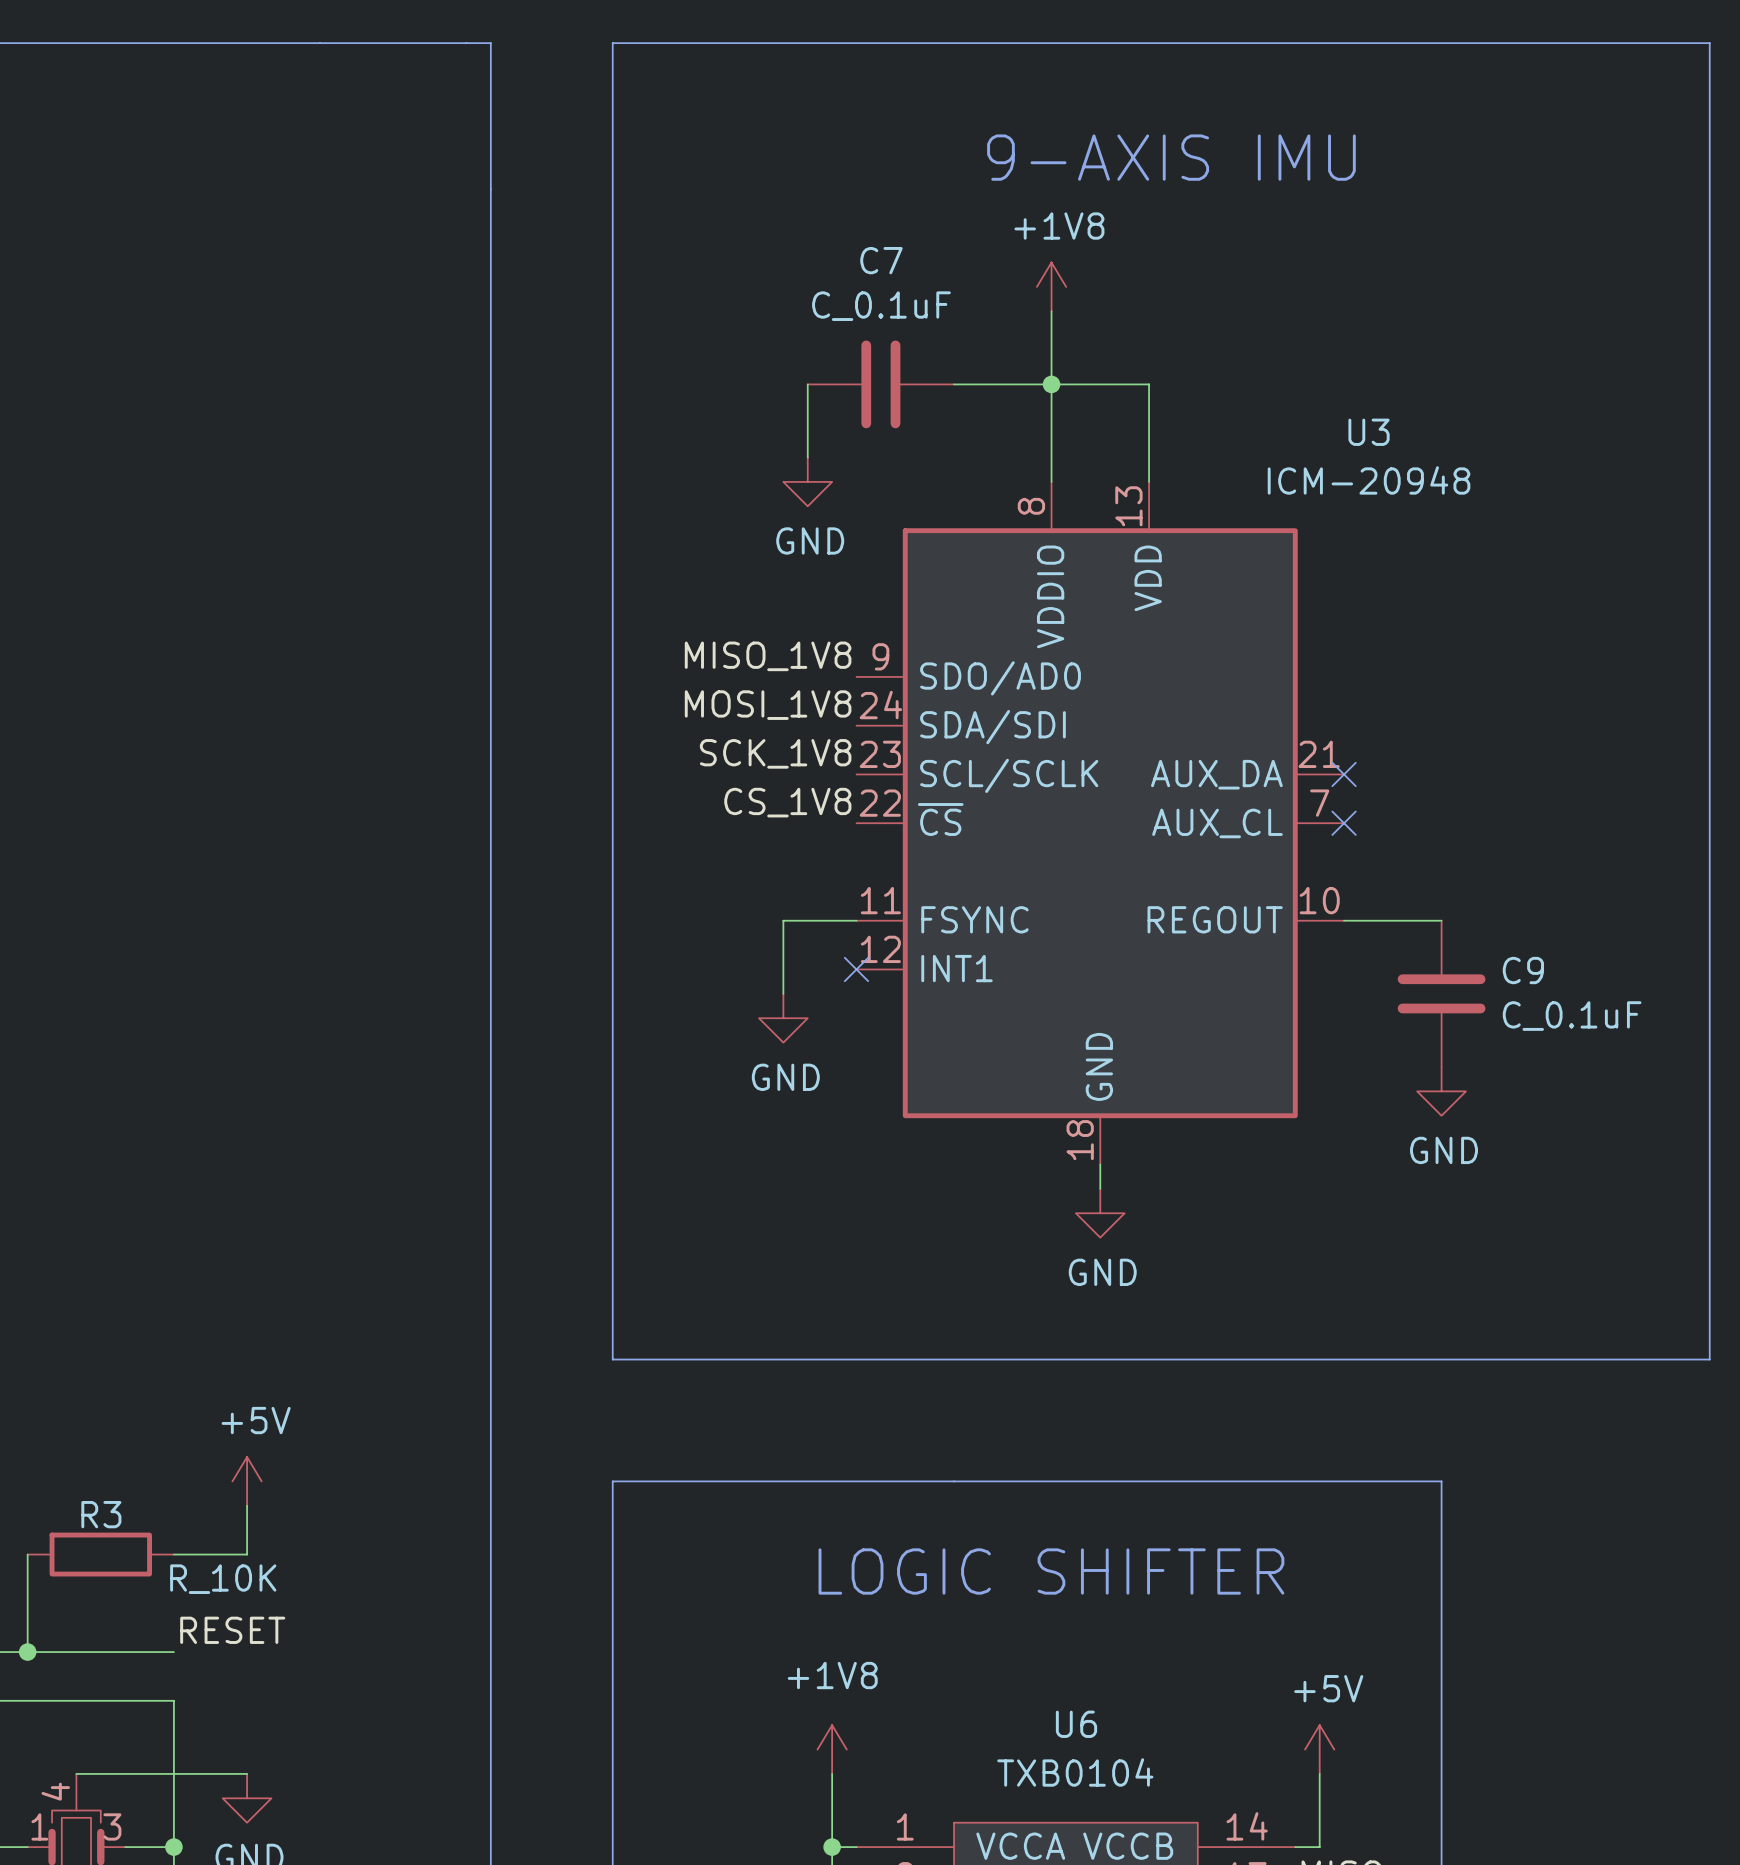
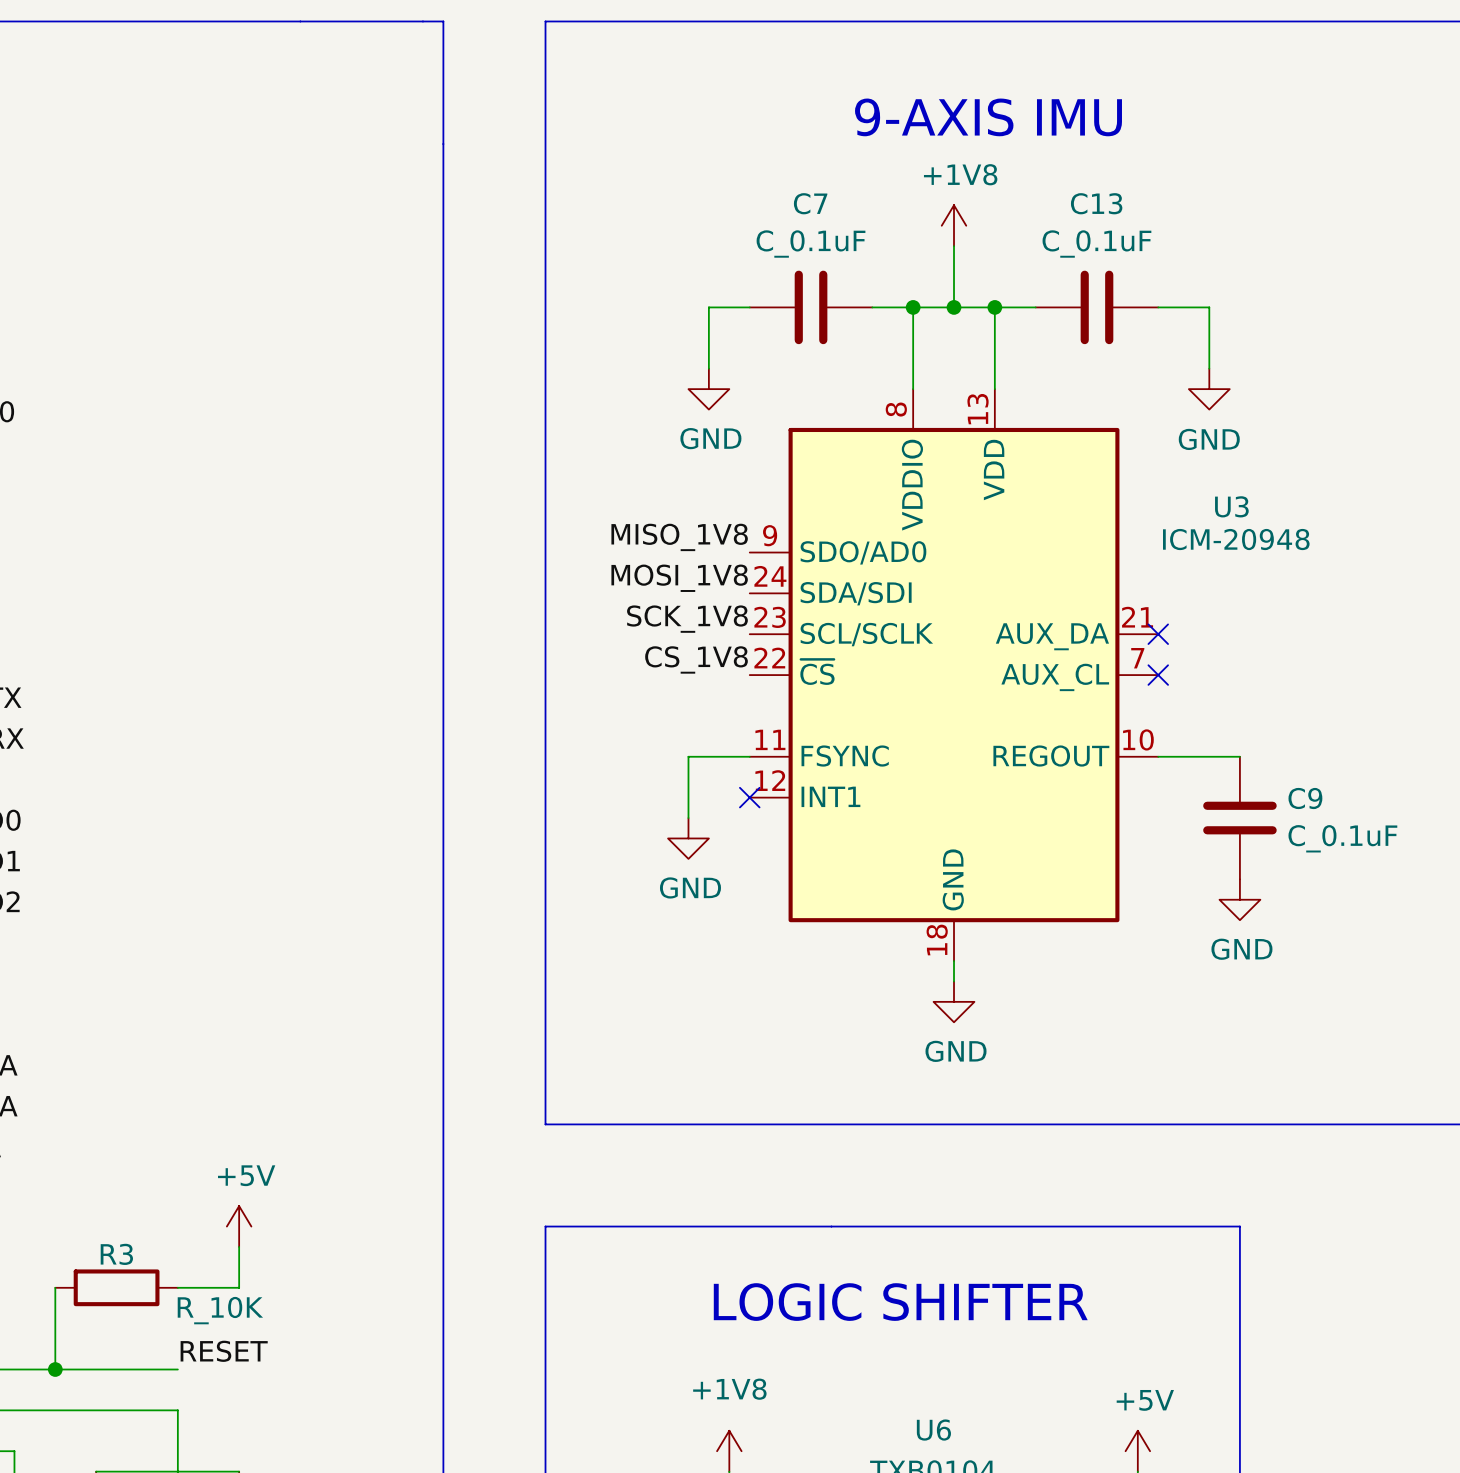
power symbol position: +1V8 (1051, 286) -> +1V8 (954, 225)
wire: (1051, 311) (1051, 384) -> (954, 246) (954, 307)
C7 position: (880, 384) -> (811, 307)
junction: none -> (954, 307)
wire: none -> (994, 307) (1035, 307)
junction: none -> (994, 307)
C13: none -> C_0.1uF (1096, 307)
wire: none -> (1158, 307) (1209, 307) (1209, 368)
U3 name position: U3 (1369, 432) -> U3 (1231, 506)
U3 value position: ICM-20948 (1369, 480) -> ICM-20948 (1236, 539)
power symbol: none -> GND (1209, 389)

